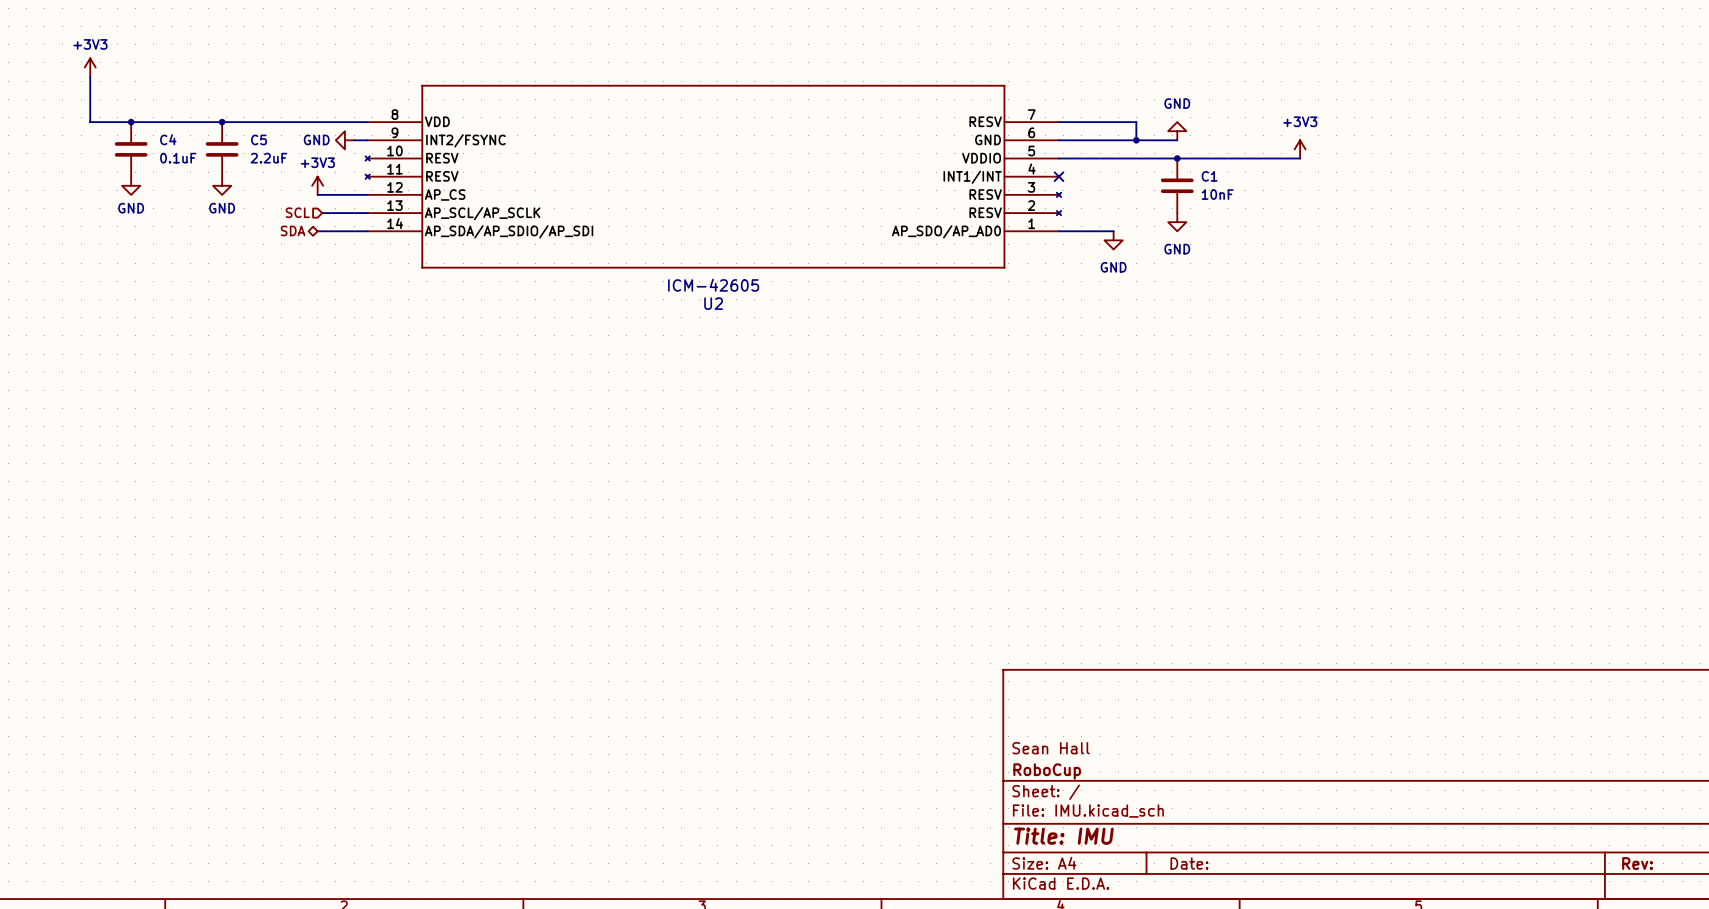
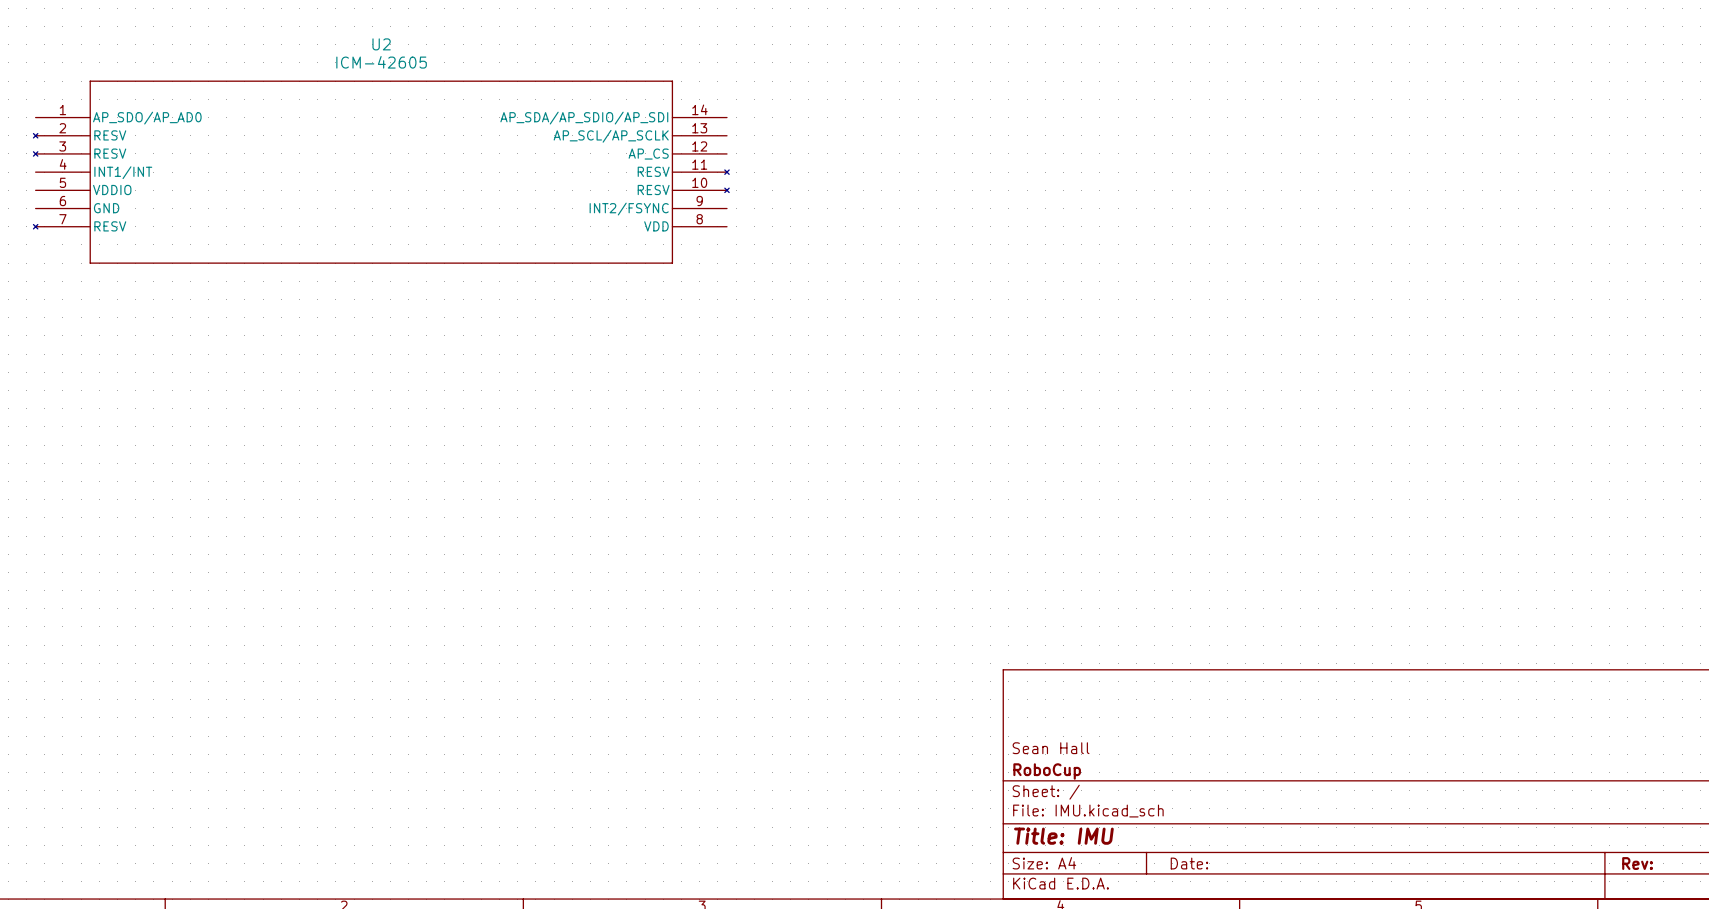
power symbol: +3V3 (90, 67) -> none
wire: (90, 76) (90, 122) (367, 122) -> none
U2 symbol: [365, 85, 1062, 269] -> [33, 80, 730, 264]
junction: (131, 122) -> none
junction: (222, 122) -> none
wire: (1059, 122) (1136, 122) (1136, 140) -> none
power symbol: GND (1177, 131) -> none
power symbol: GND (344, 140) -> none
wire: (354, 140) (367, 140) -> none
wire: (1059, 140) (1177, 140) -> none
junction: (1136, 140) -> none
C4: 0.1uF (131, 149) -> none
C5: 2.2uF (222, 149) -> none
power symbol: +3V3 (1300, 149) -> none
wire: (1059, 158) (1300, 158) -> none
junction: (1177, 158) -> none
no-connect mark: (1059, 176) -> none
power symbol: GND (131, 185) -> none
power symbol: GND (222, 185) -> none
power symbol: +3V3 (317, 185) -> none
C1: 10nF (1177, 185) -> none
wire: (317, 194) (367, 194) -> none
hierarchical label: SCL (297, 212) -> none
wire: (322, 213) (367, 213) -> none
power symbol: GND (1177, 222) -> none
hierarchical label: SDA (293, 230) -> none
wire: (317, 231) (367, 231) -> none
wire: (1059, 231) (1113, 231) -> none
power symbol: GND (1113, 240) -> none
U2 value position: ICM-42605 (713, 285) -> ICM-42605 (381, 62)
U2 name position: U2 (713, 303) -> U2 (381, 44)

